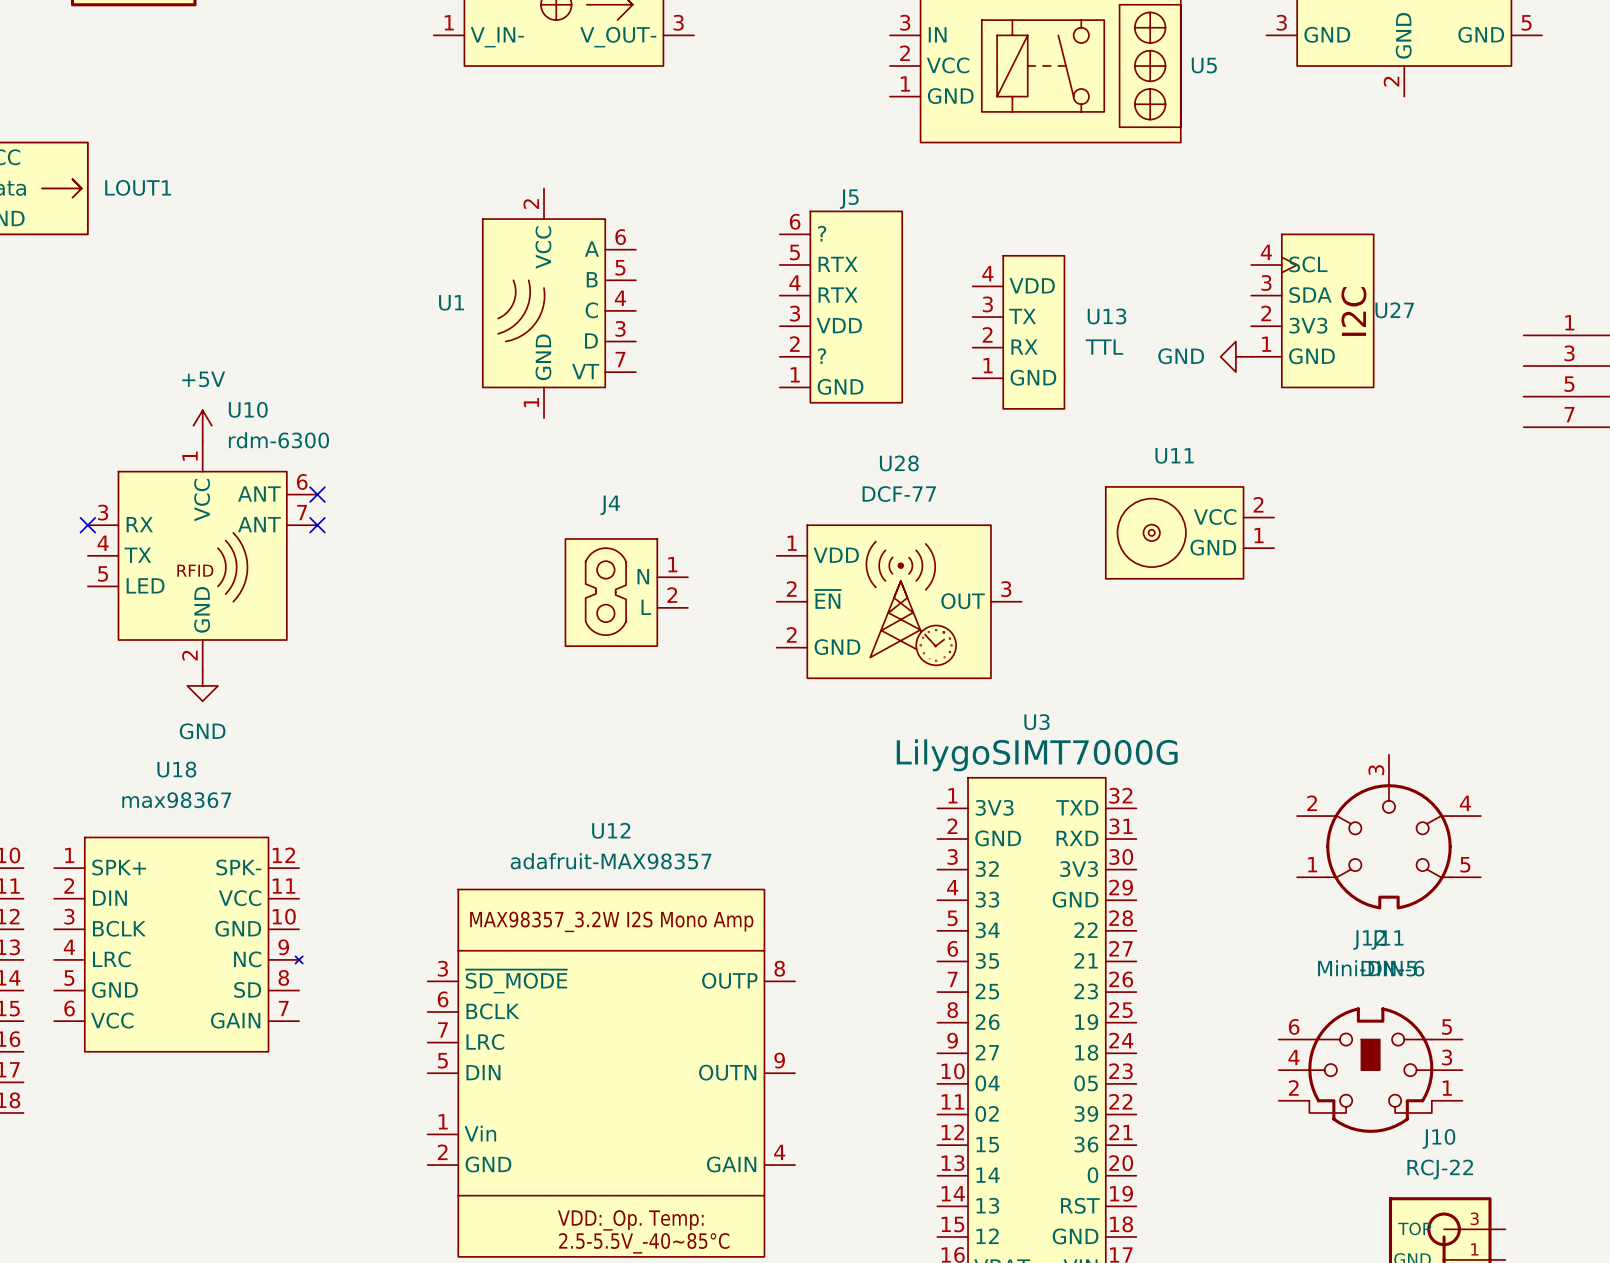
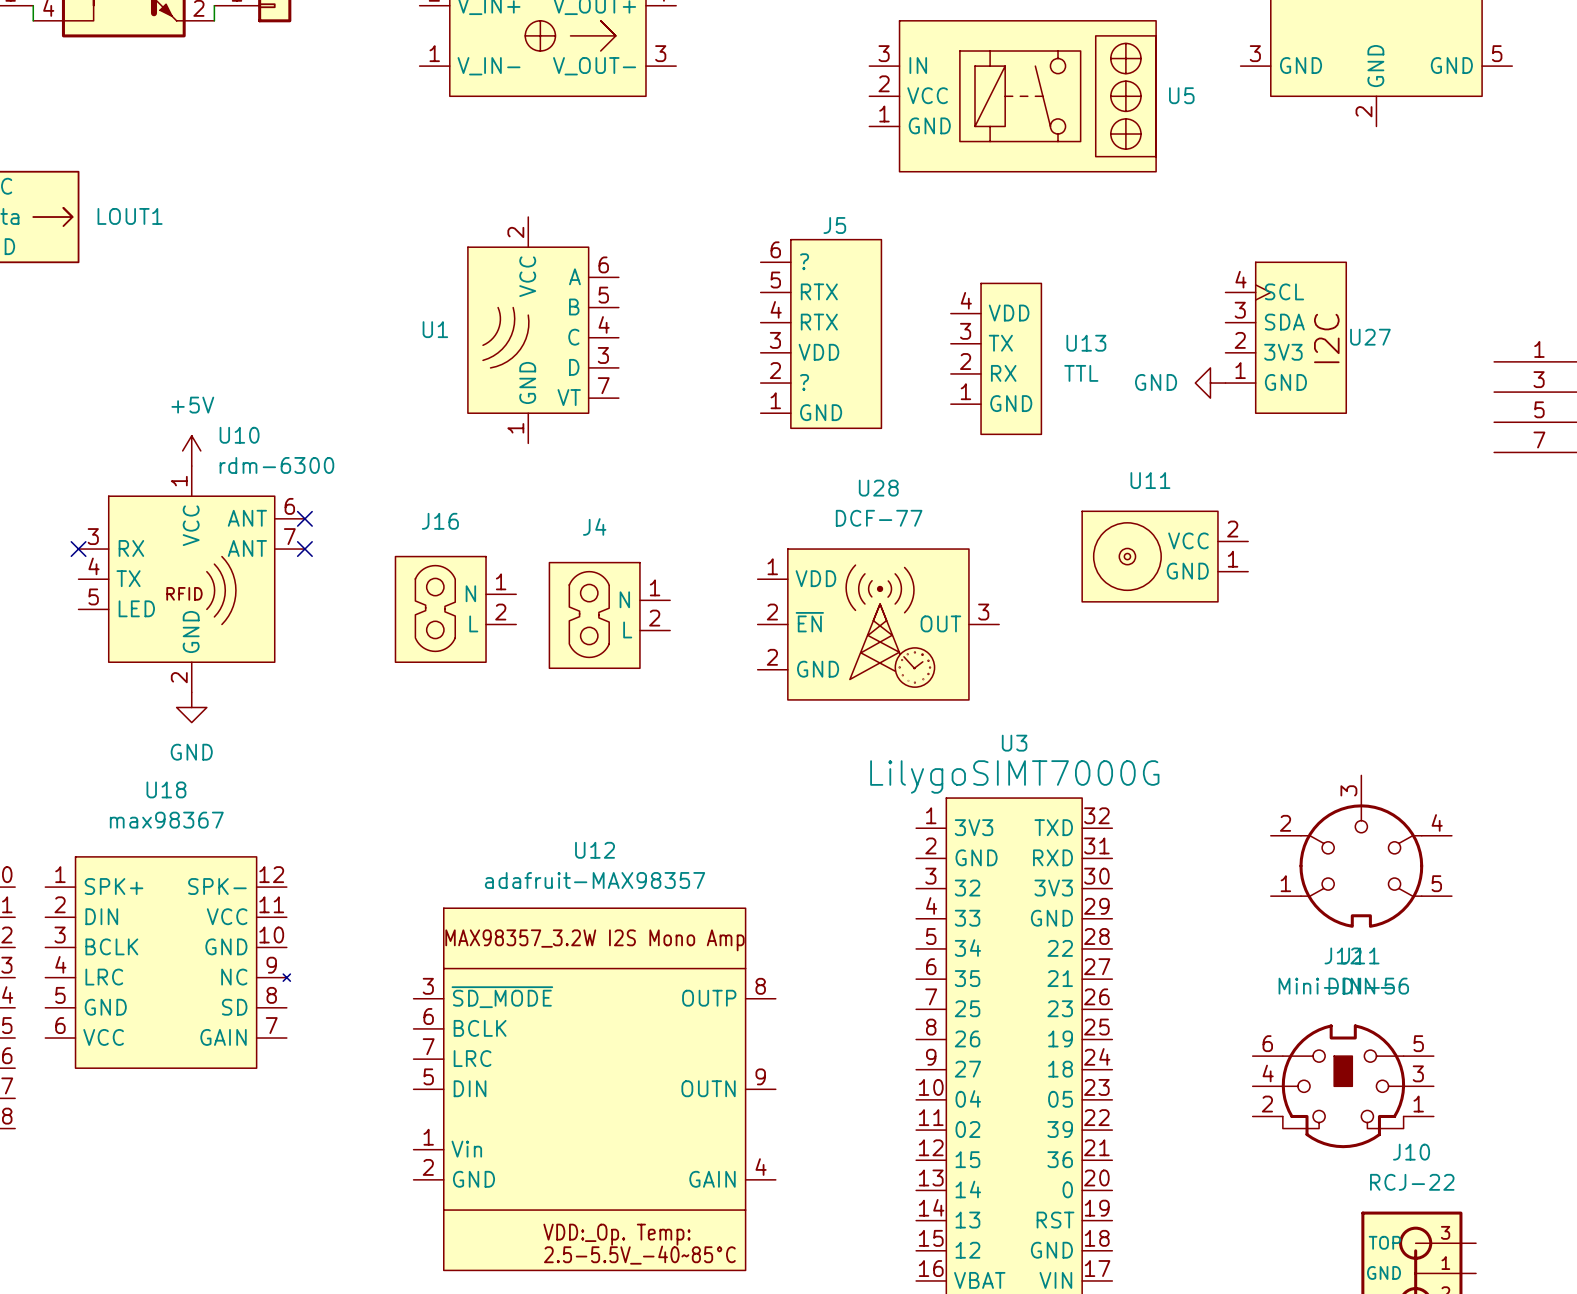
J16: none -> (455, 609)

